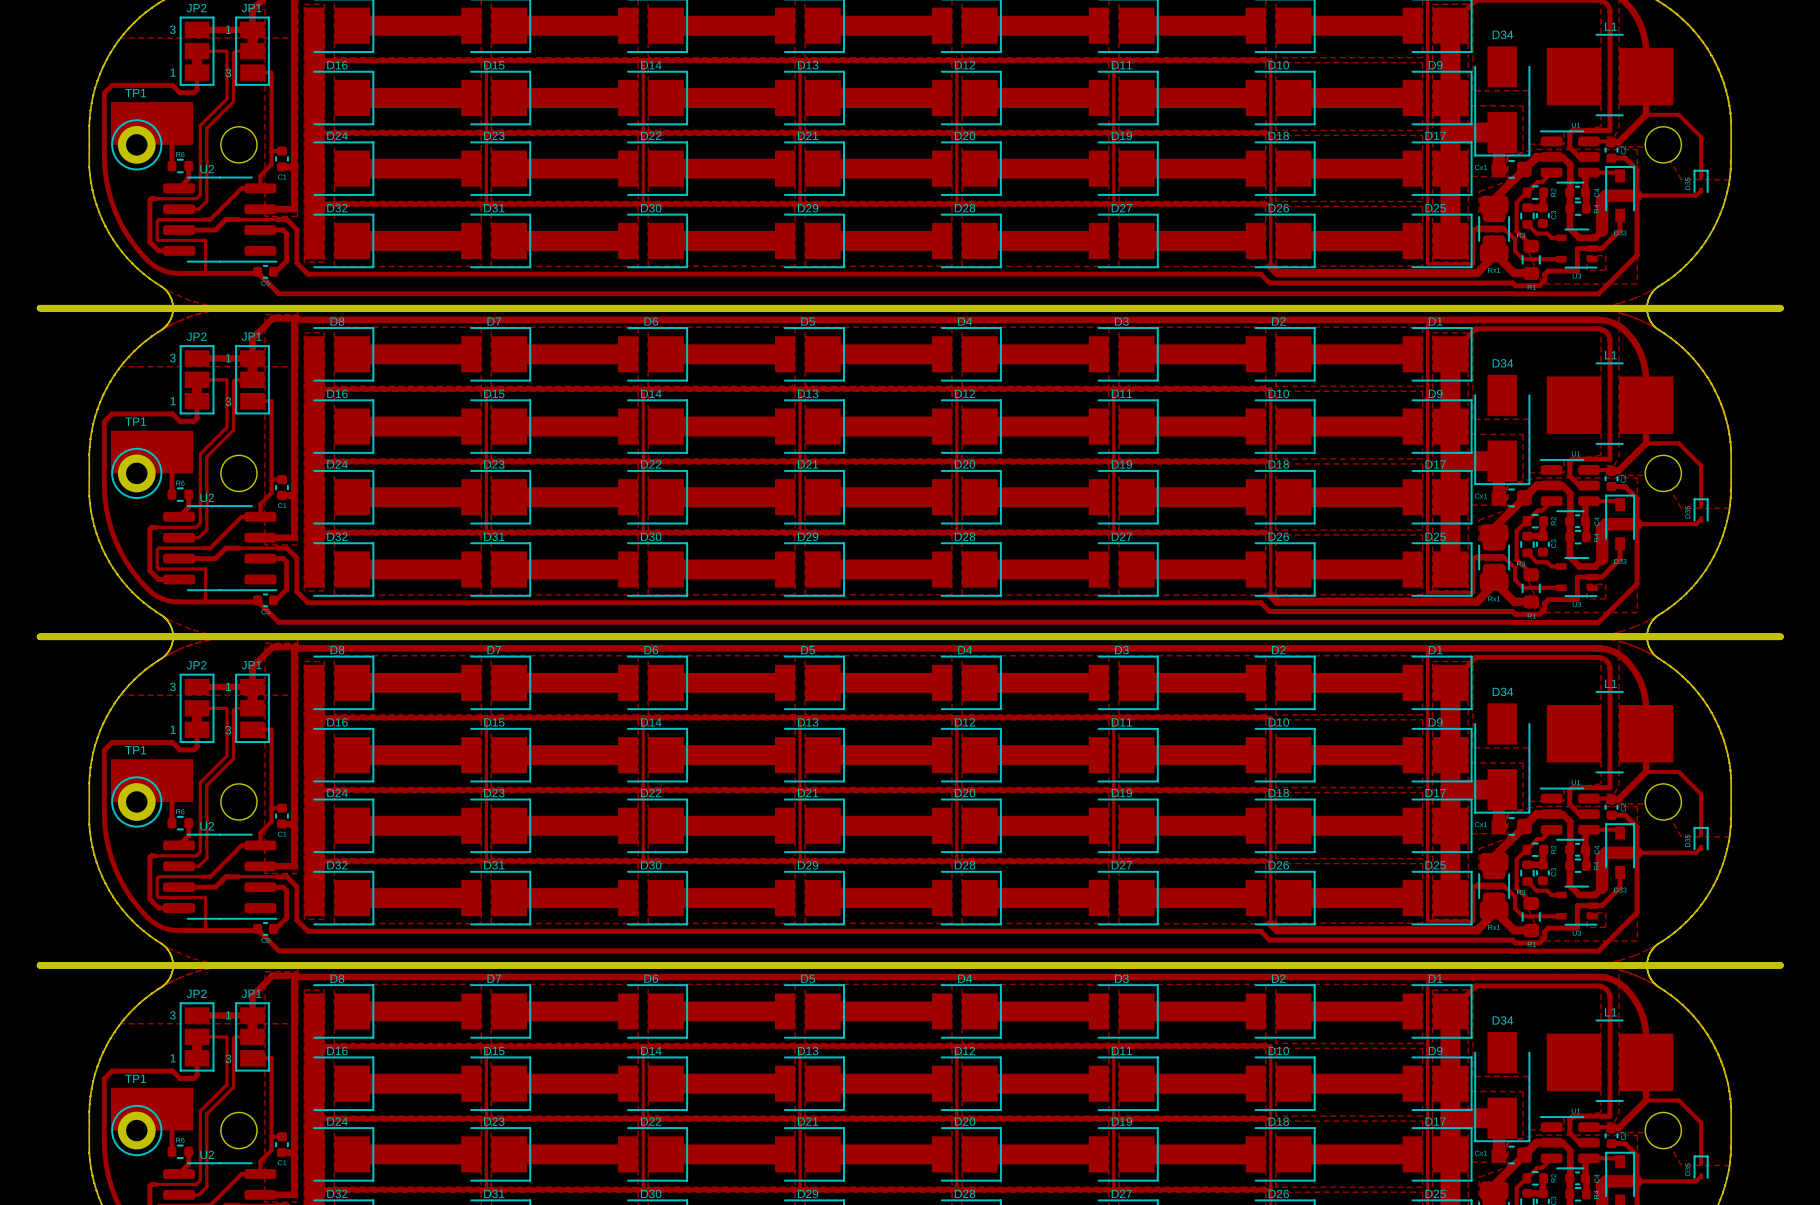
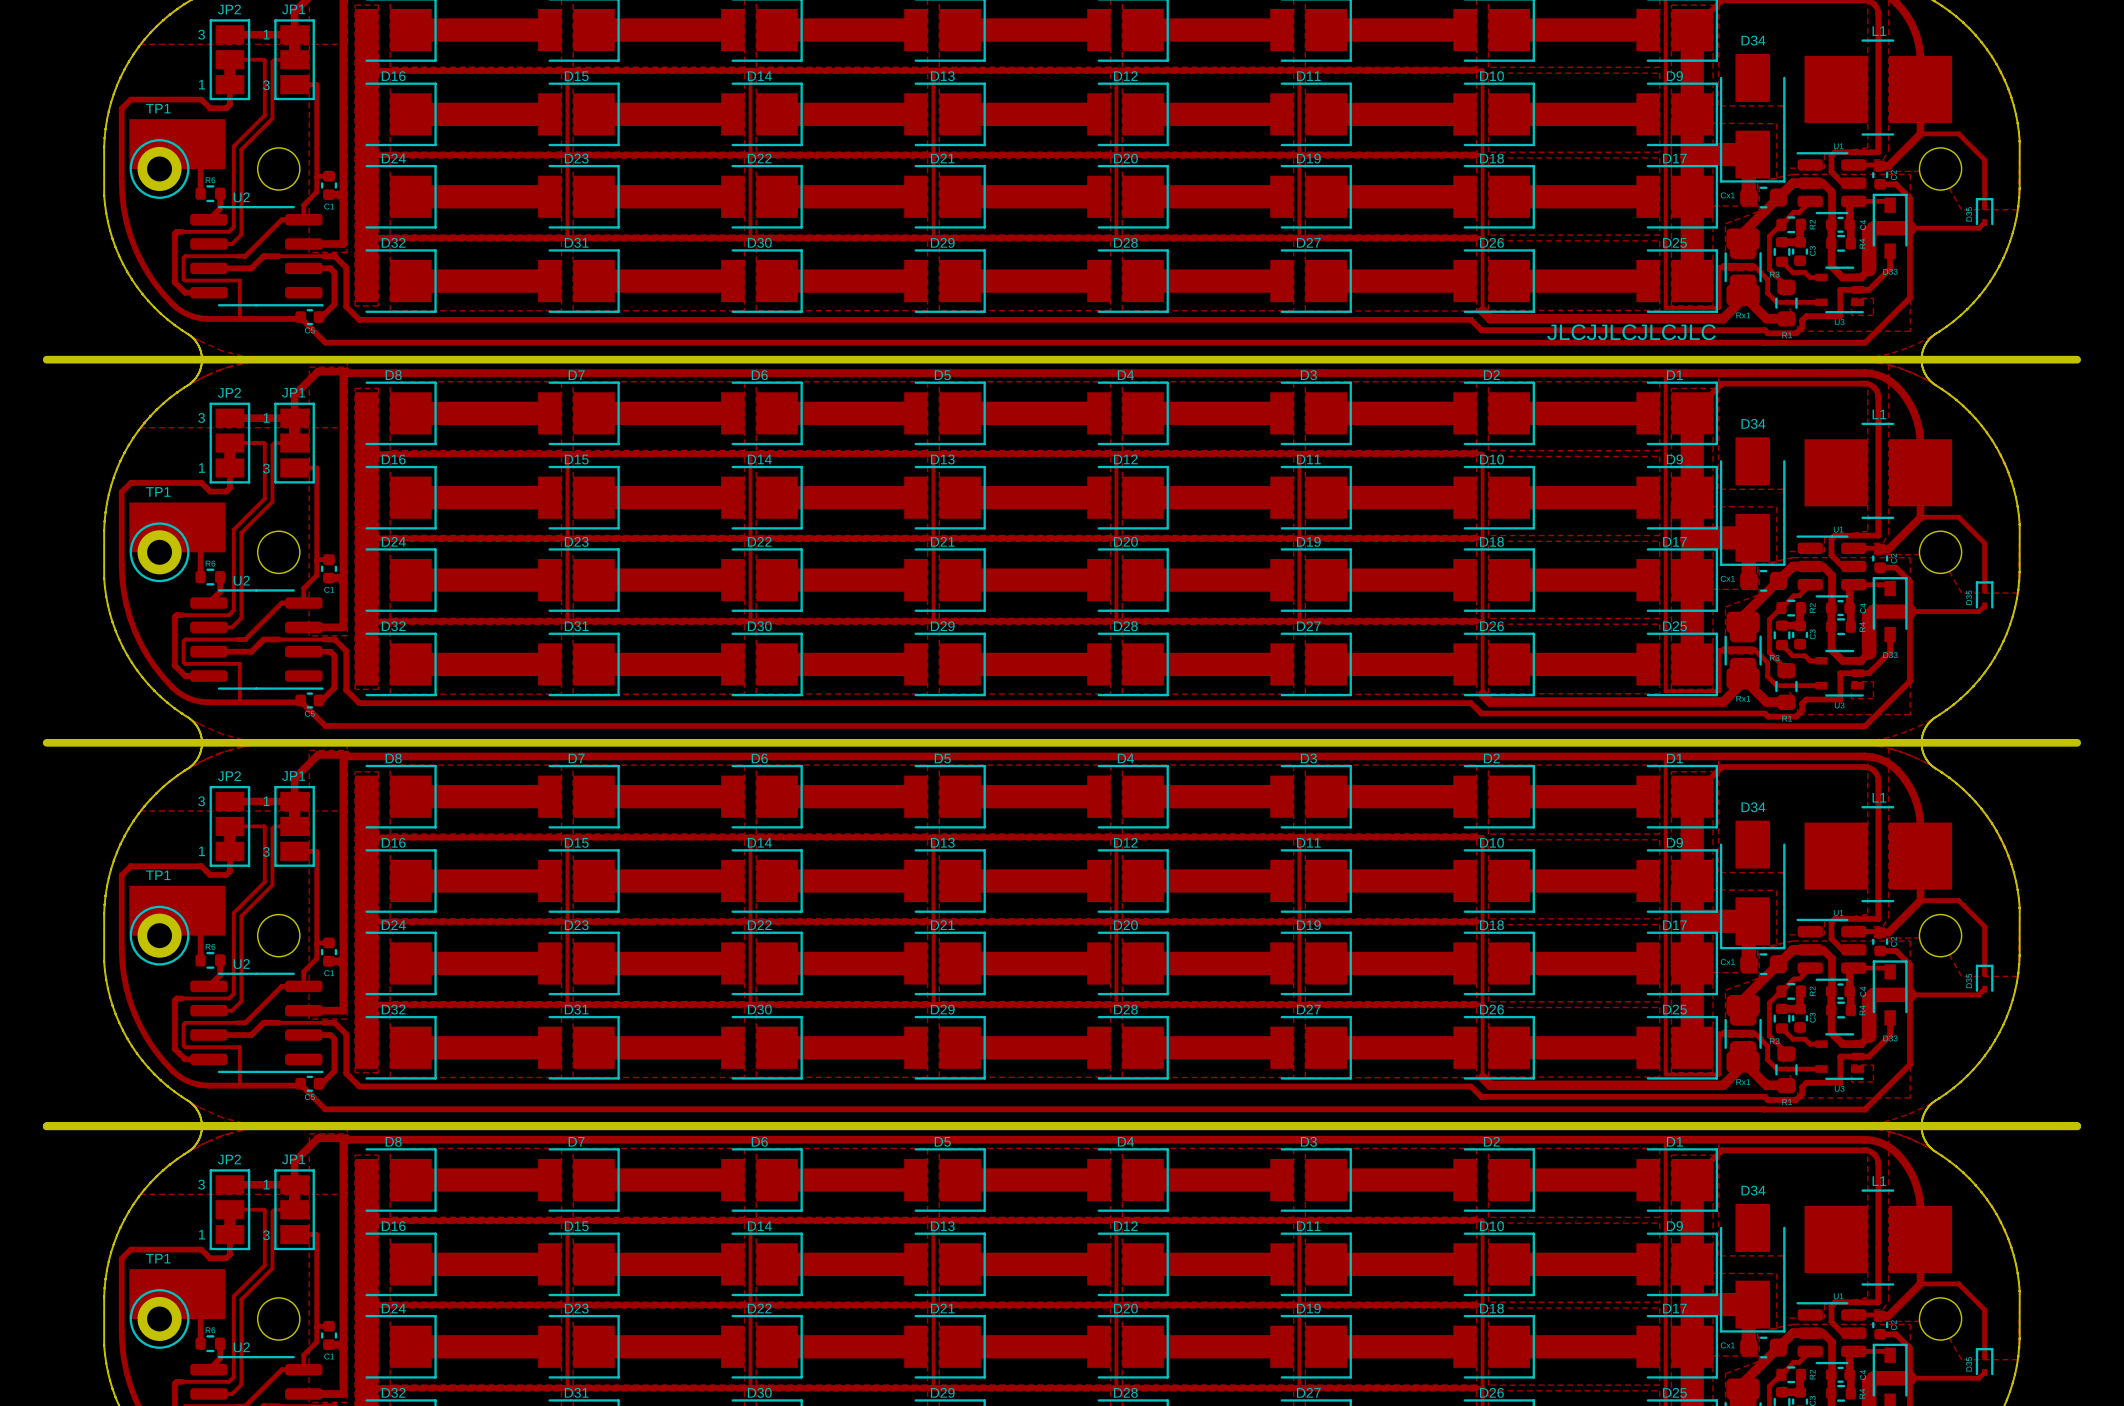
text: none -> JLCJJLCJLCJLC (1631, 332)

